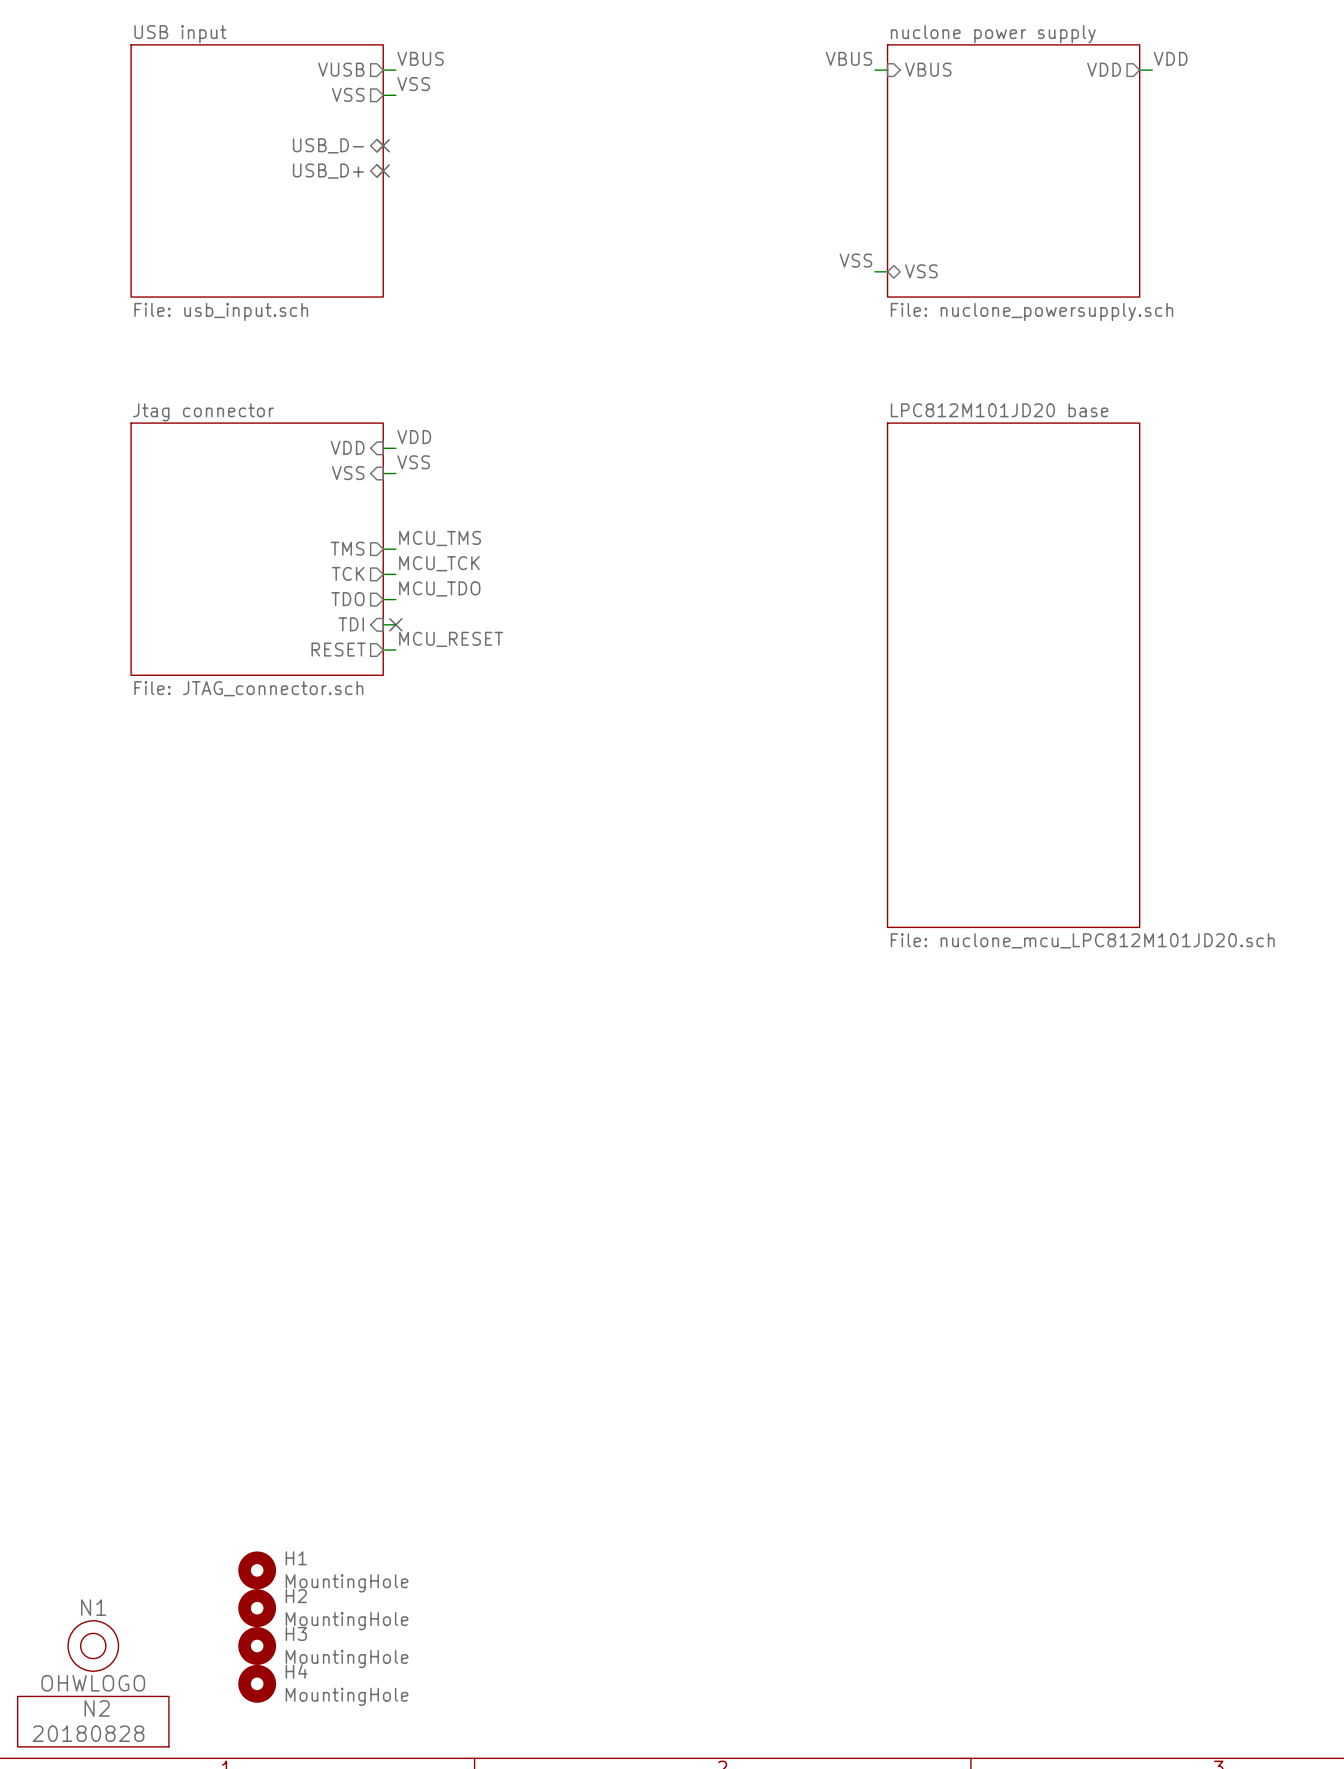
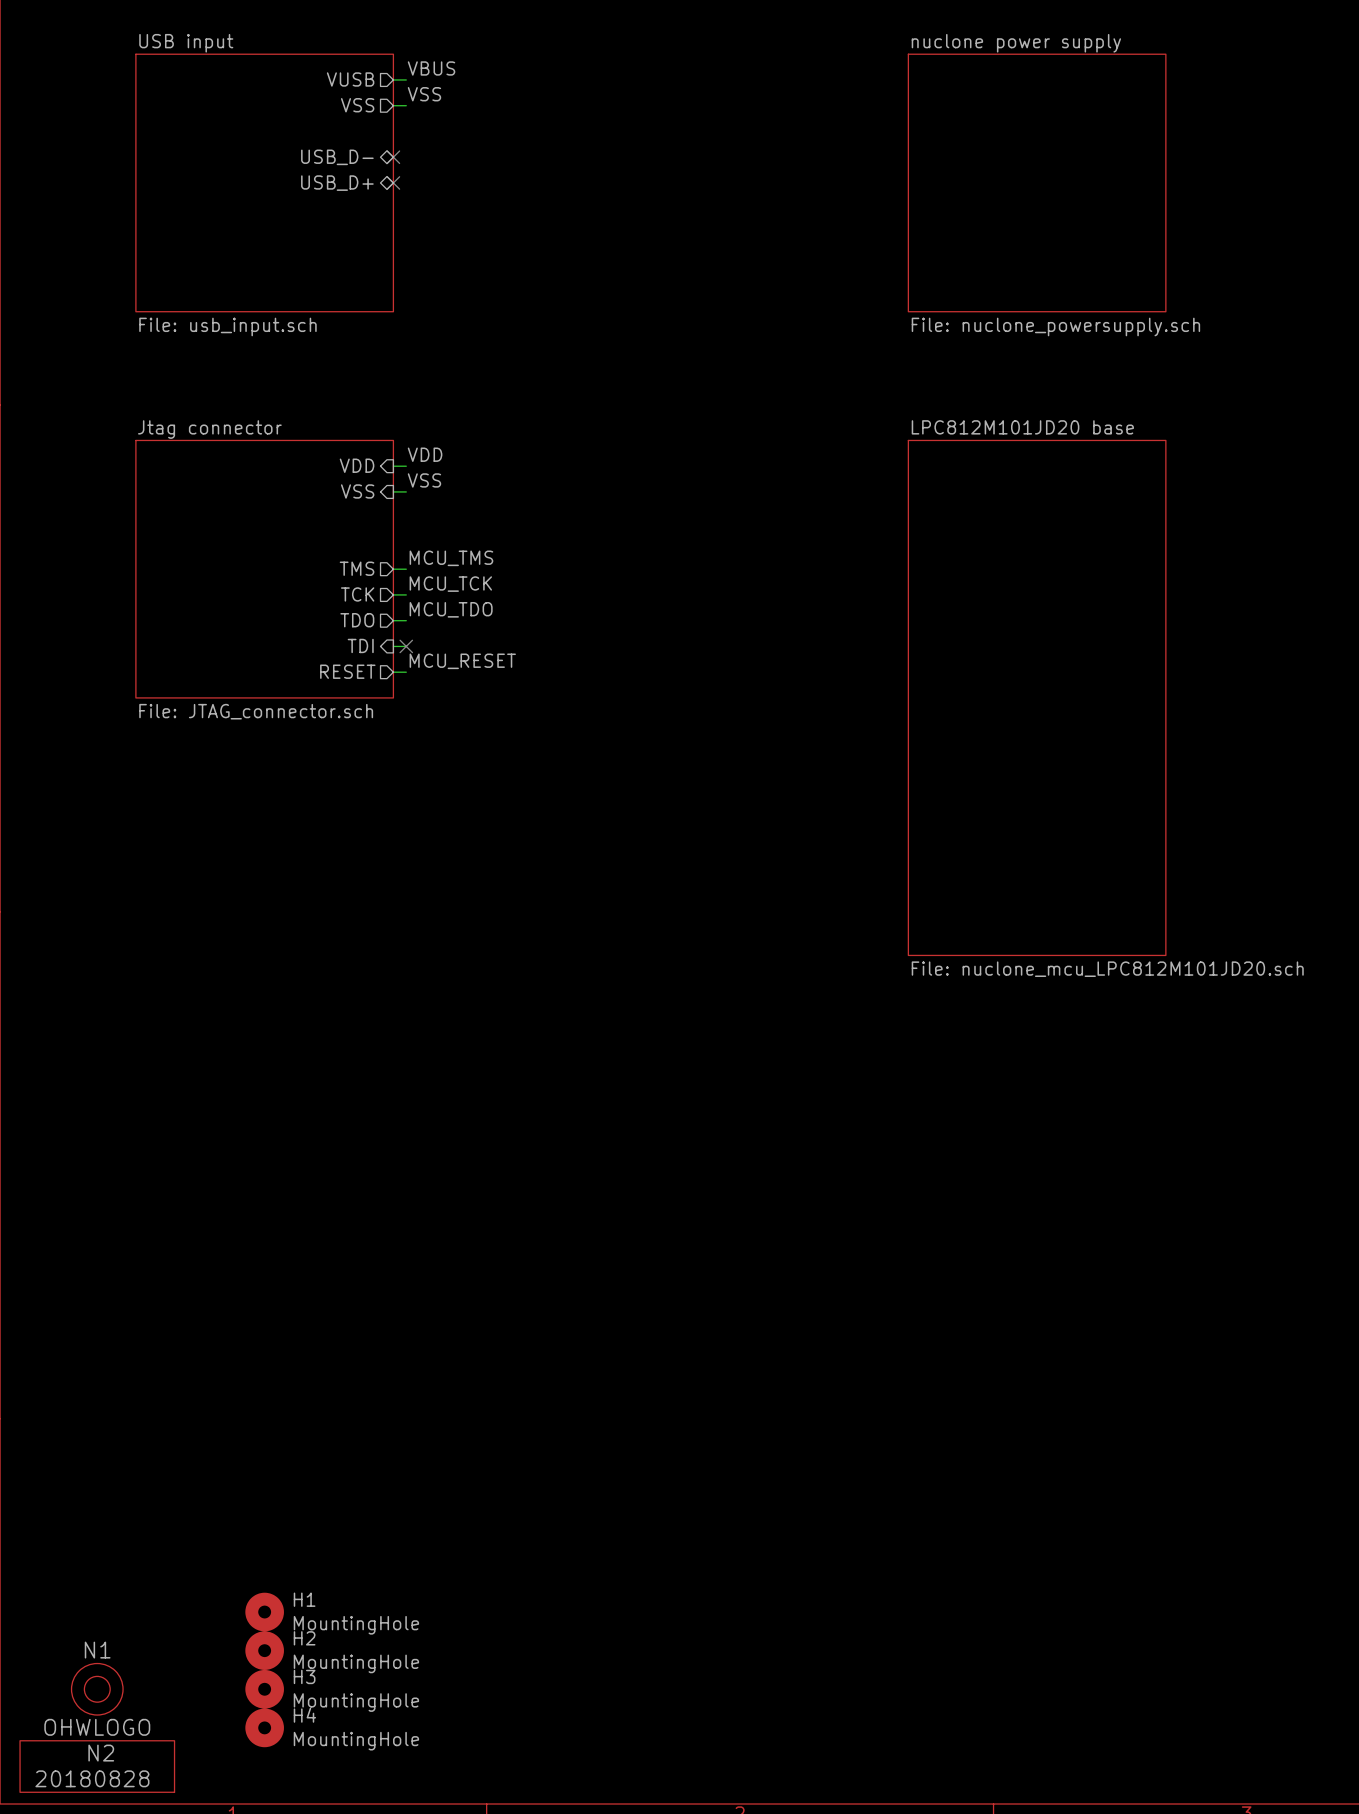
label: VBUS (849, 58) -> none
label: VDD (1170, 58) -> none
sheet pin: VBUS (928, 69) -> none
sheet pin: VDD (1104, 69) -> none
wire: (874, 70) (887, 70) -> none
wire: (1139, 70) (1152, 70) -> none
label: VSS (855, 260) -> none
wire: (874, 271) (887, 271) -> none
sheet pin: VSS (921, 271) -> none

